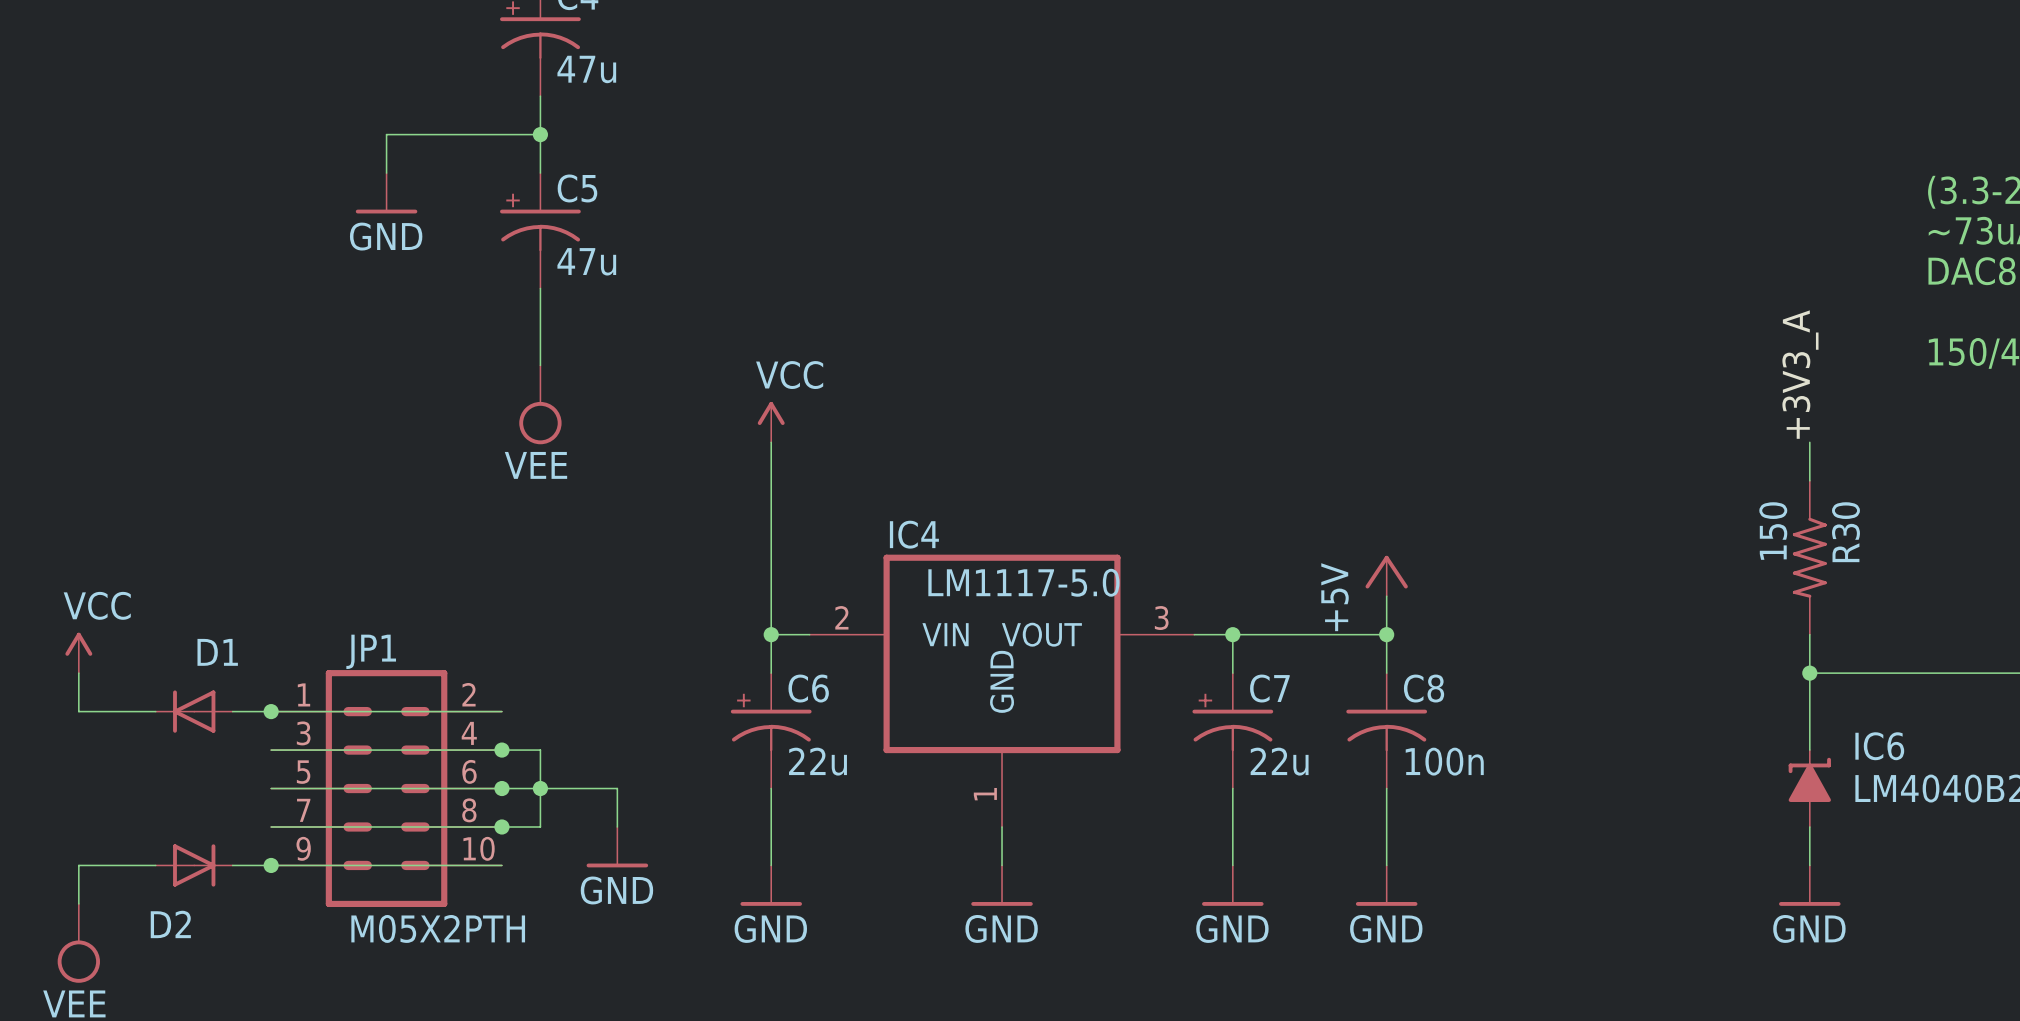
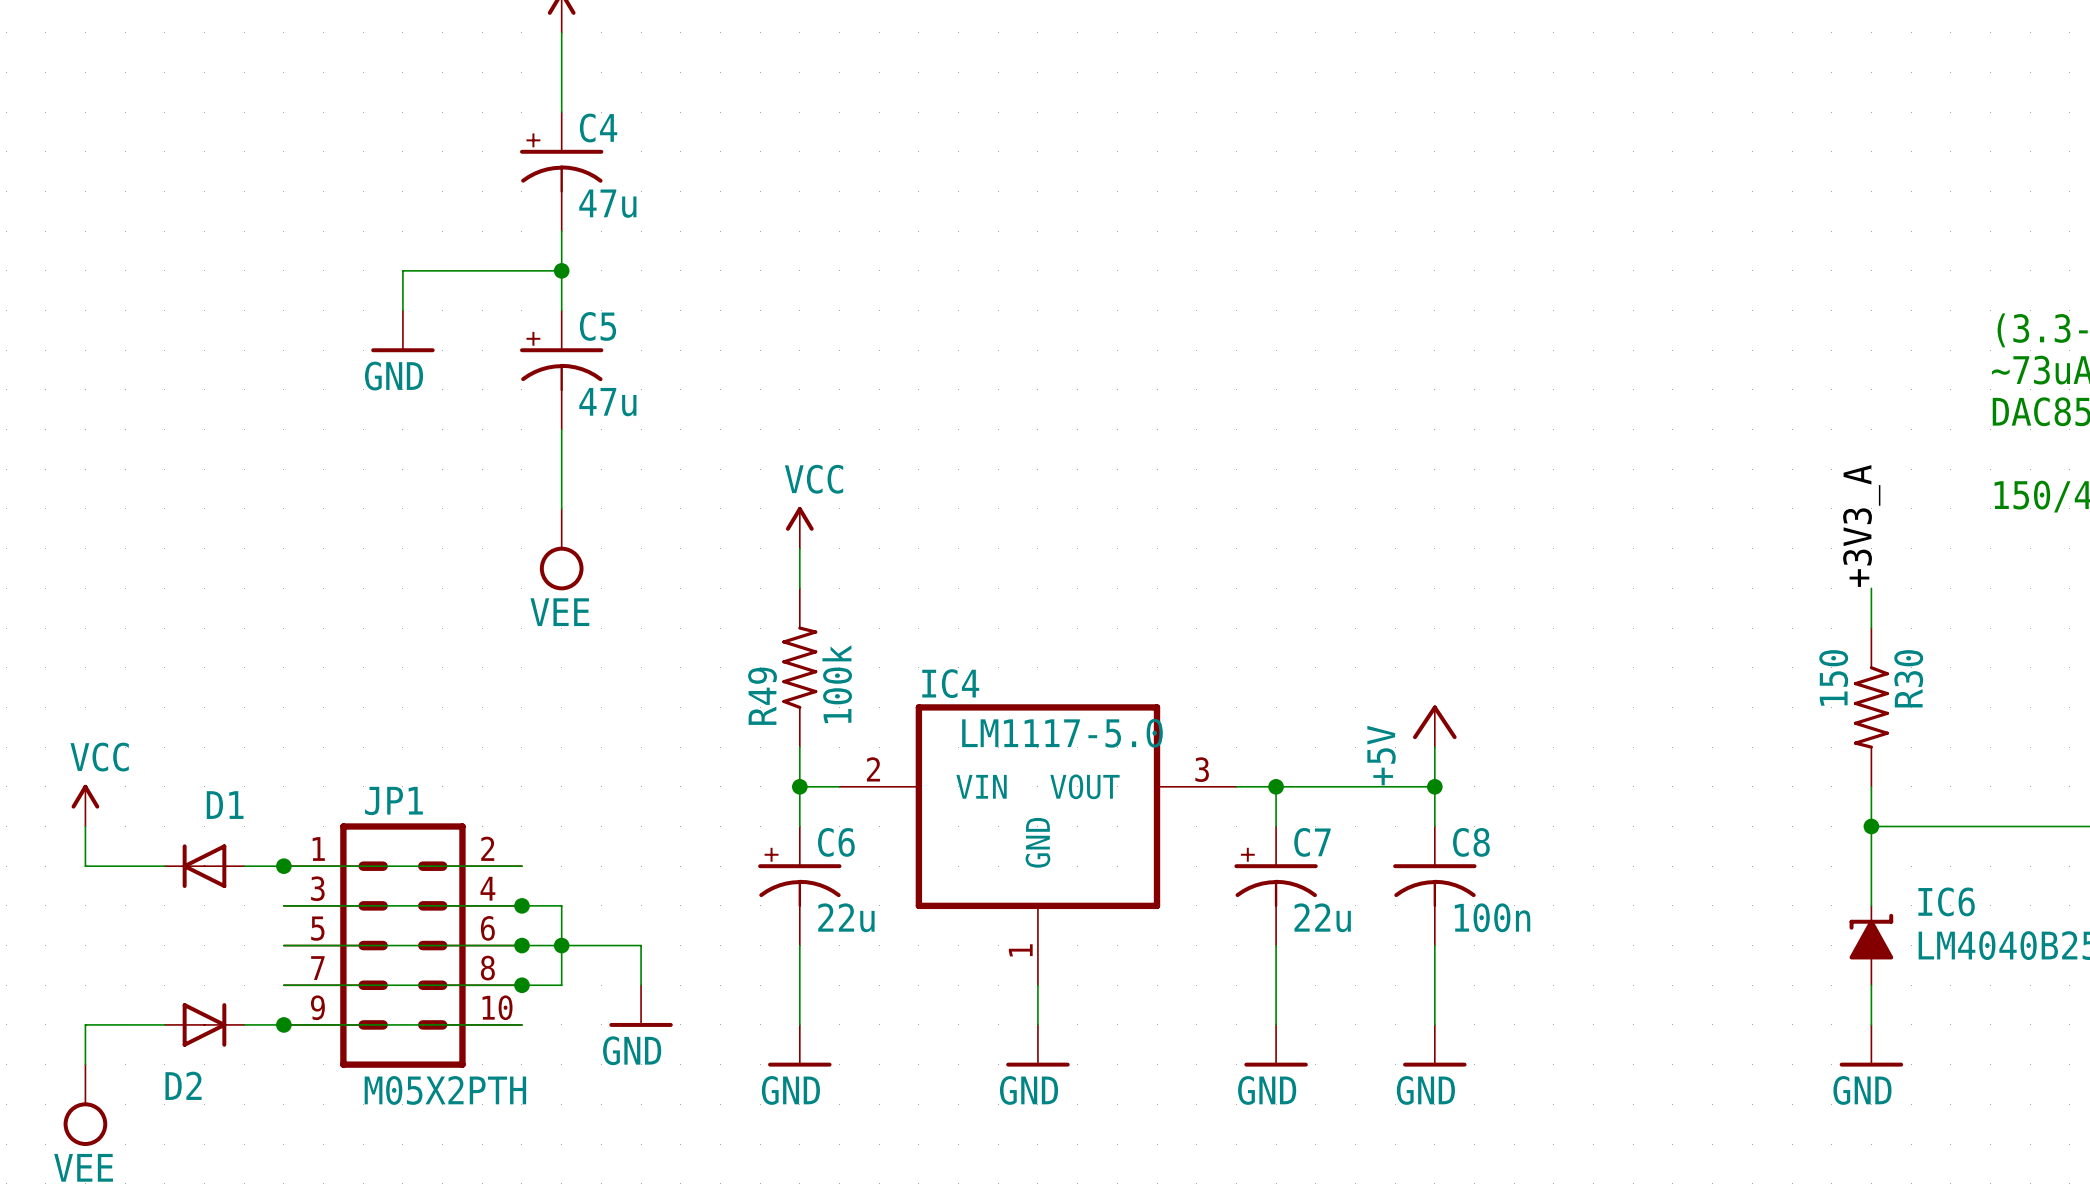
power symbol position: VCC (771, 422) -> VCC (799, 527)
R49: none -> 100k (799, 667)

